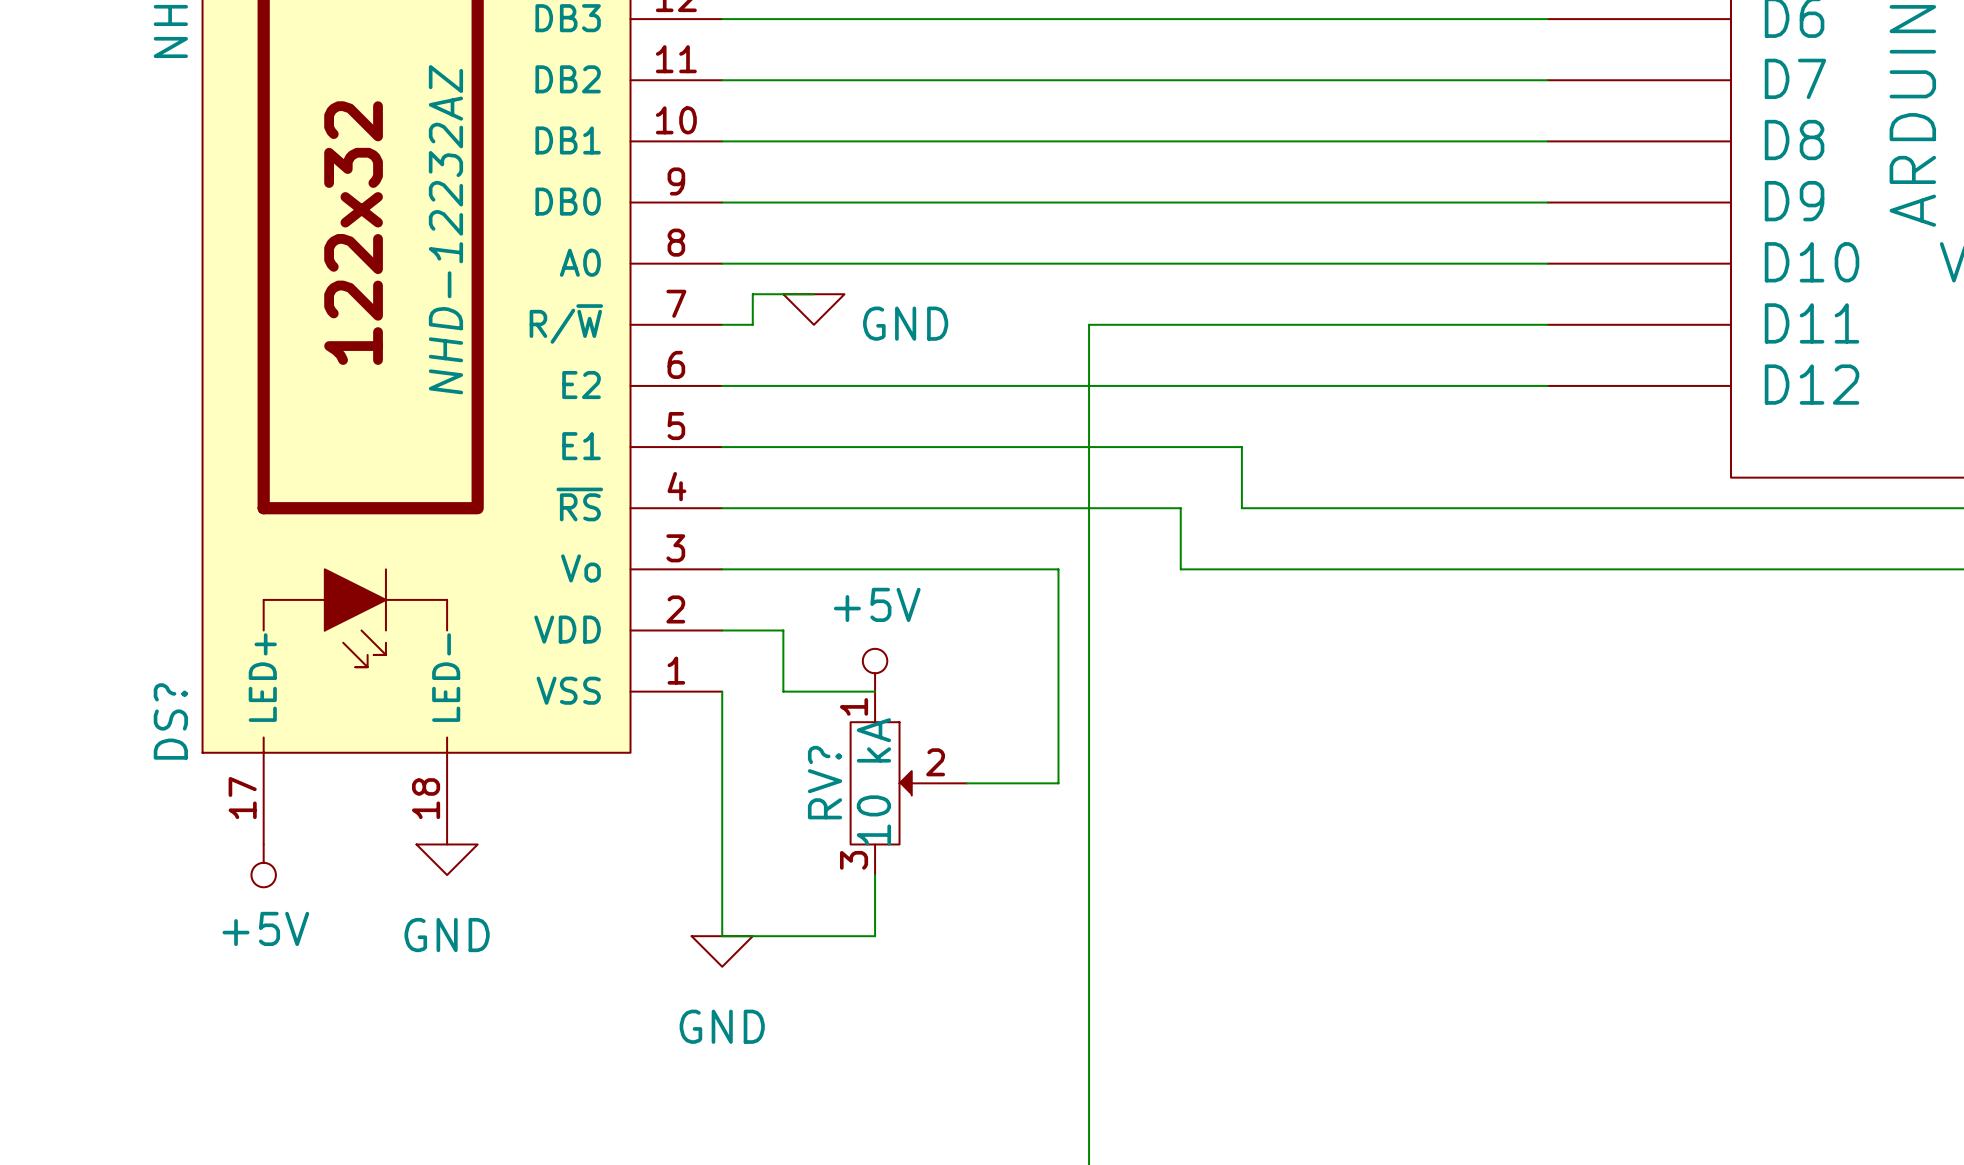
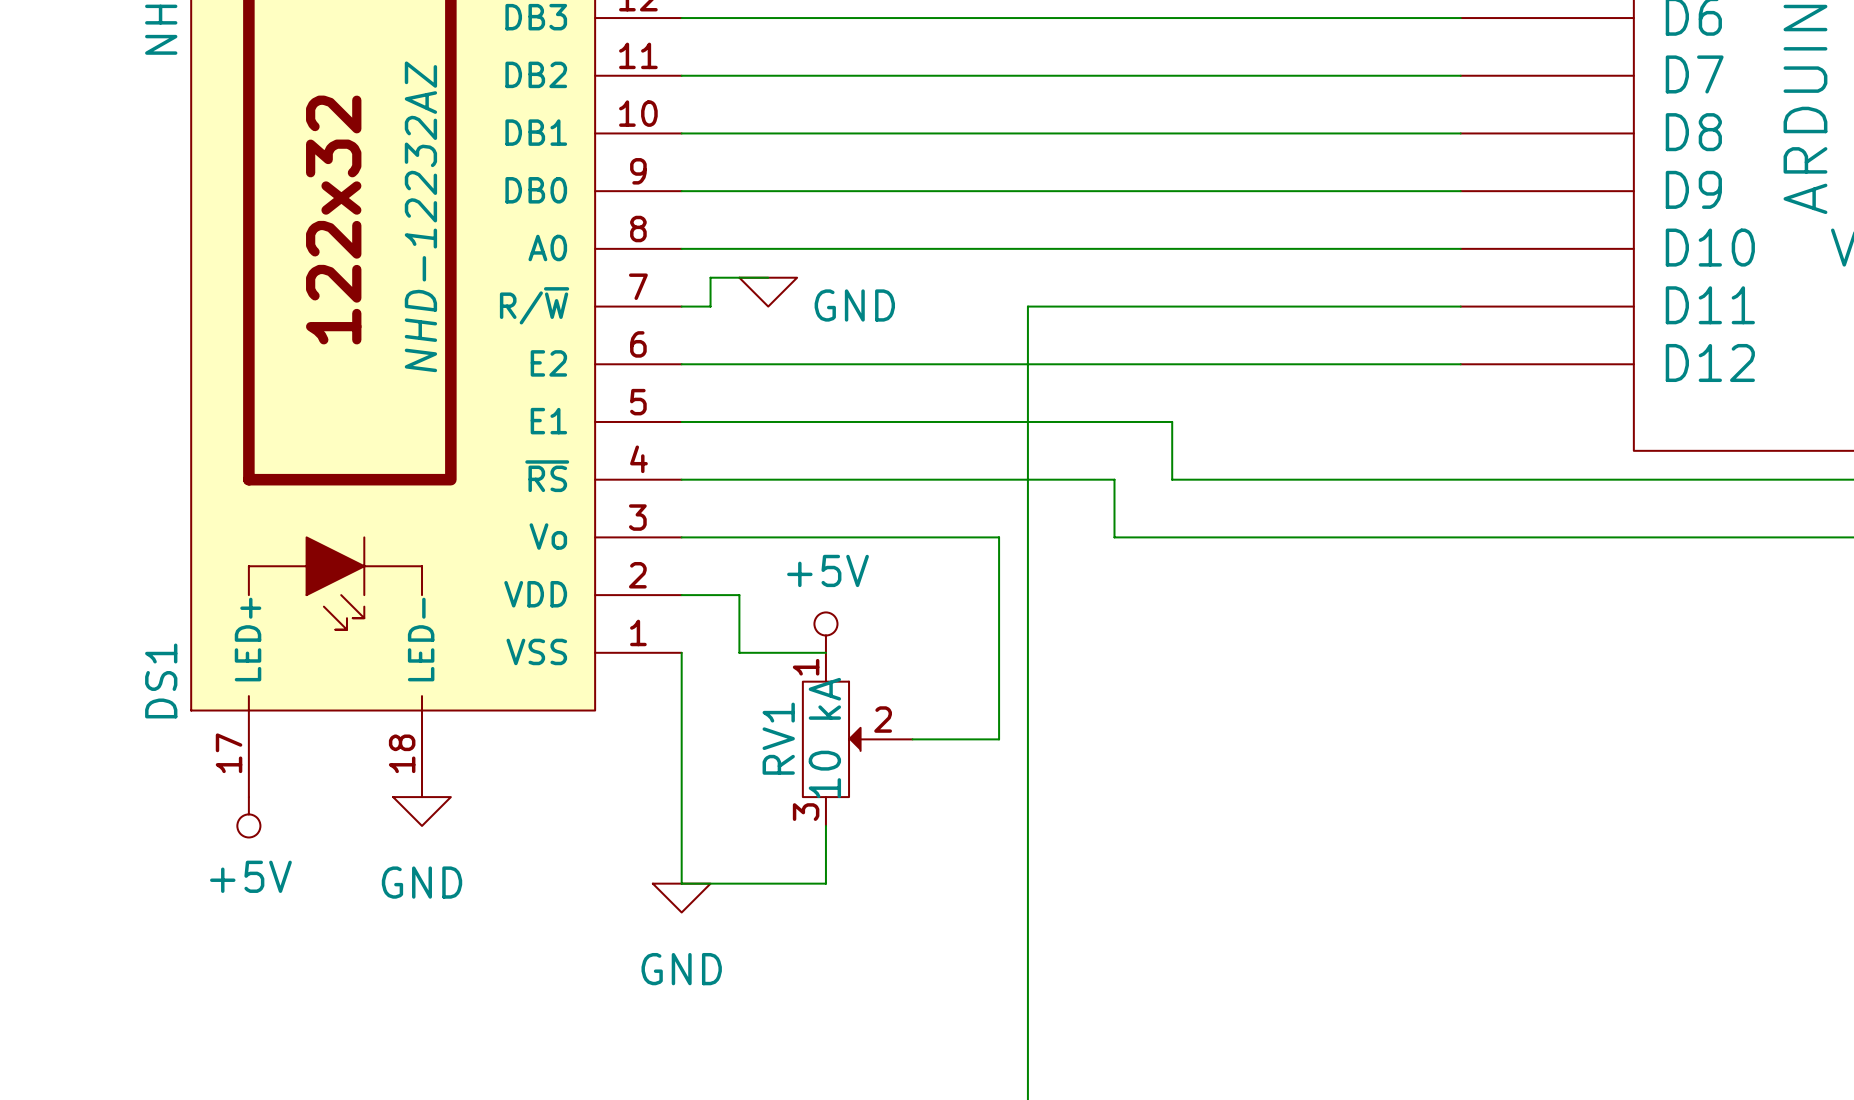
DS? name: DS? (170, 721) -> DS1 (161, 680)
RV? name: RV? (825, 782) -> RV1 (778, 738)

